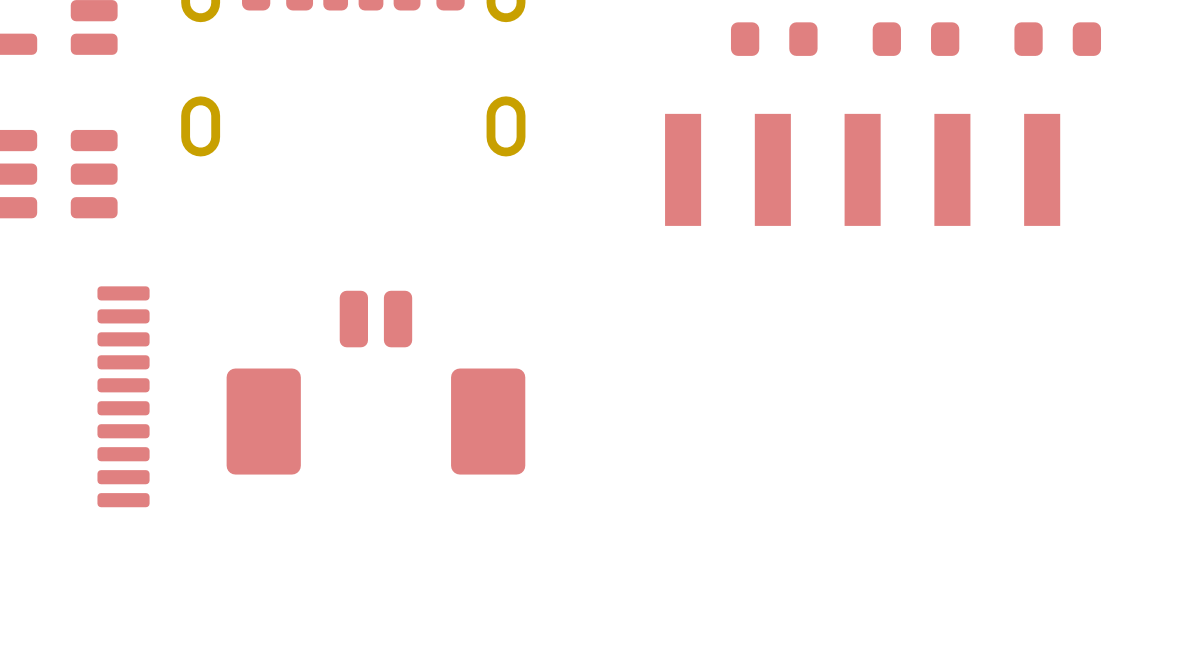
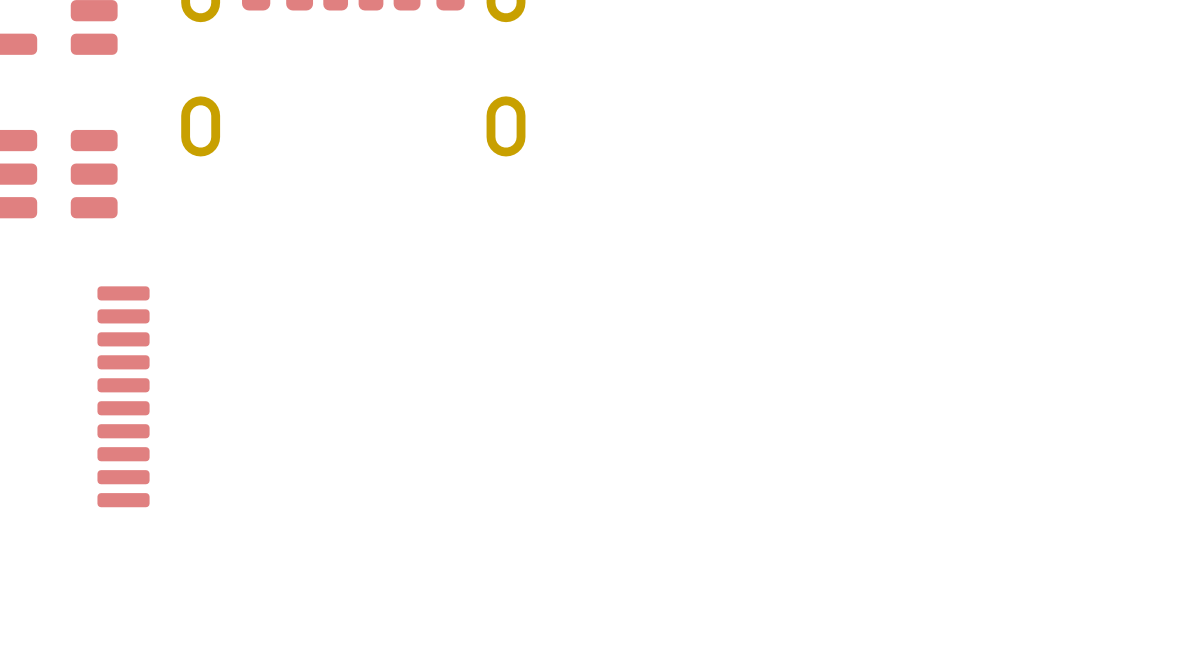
part: (774, 39) -> none
part: (915, 39) -> none
part: (1057, 39) -> none
part: (862, 169) -> none
part: (375, 382) -> none

